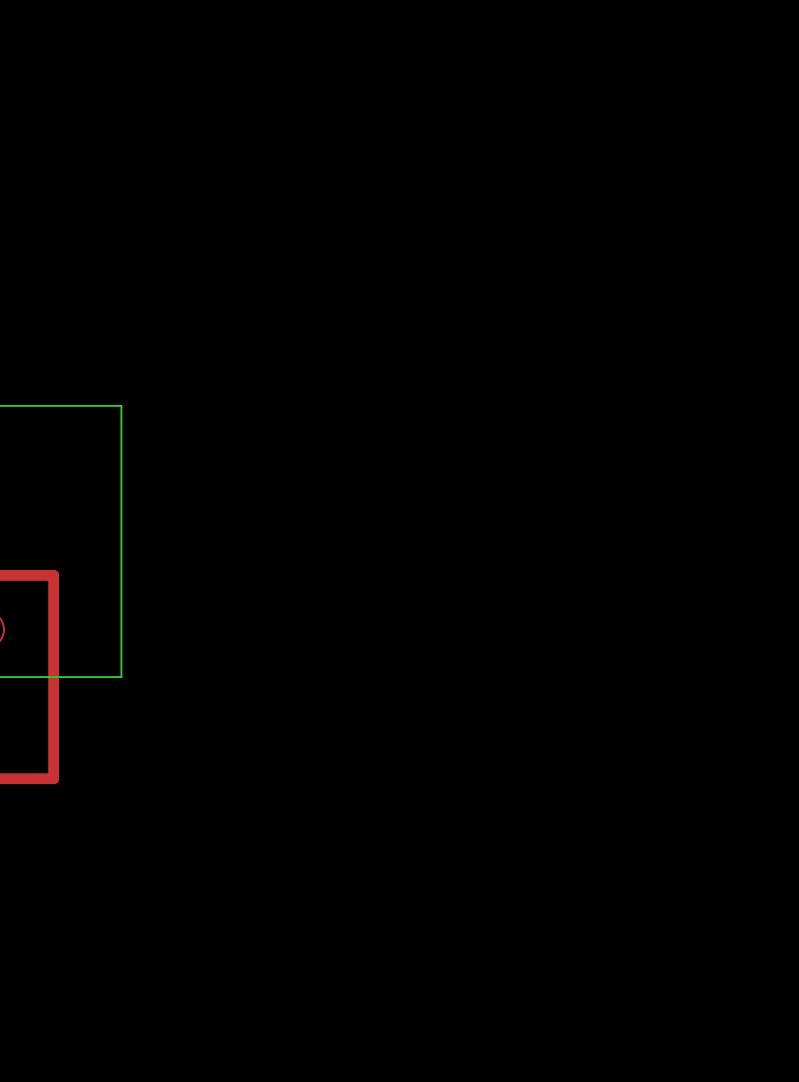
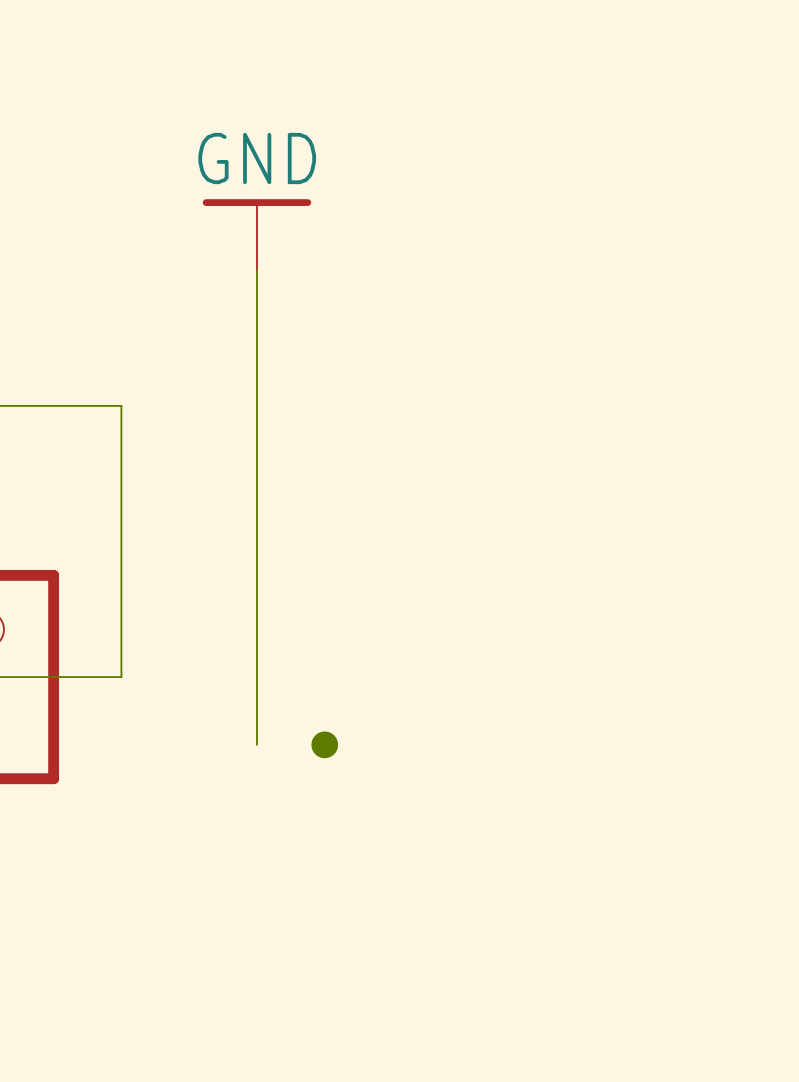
power symbol: none -> GND (256, 234)
wire: none -> (256, 270) (256, 744)
junction: none -> (324, 744)

